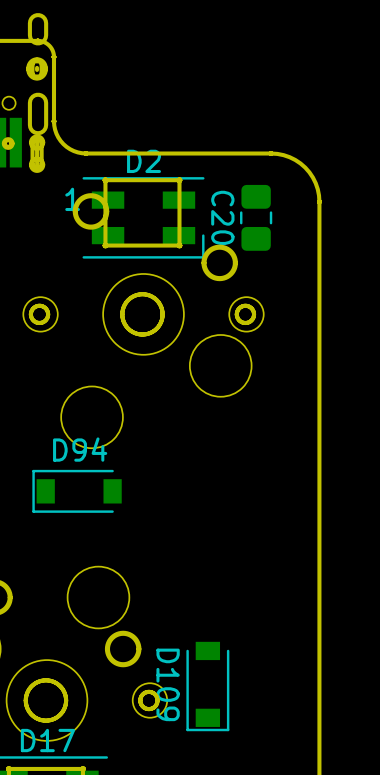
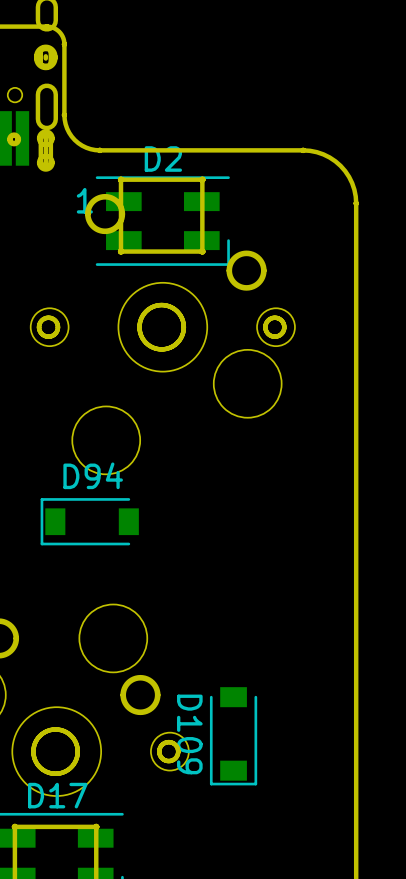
C20: (256, 217) -> none

